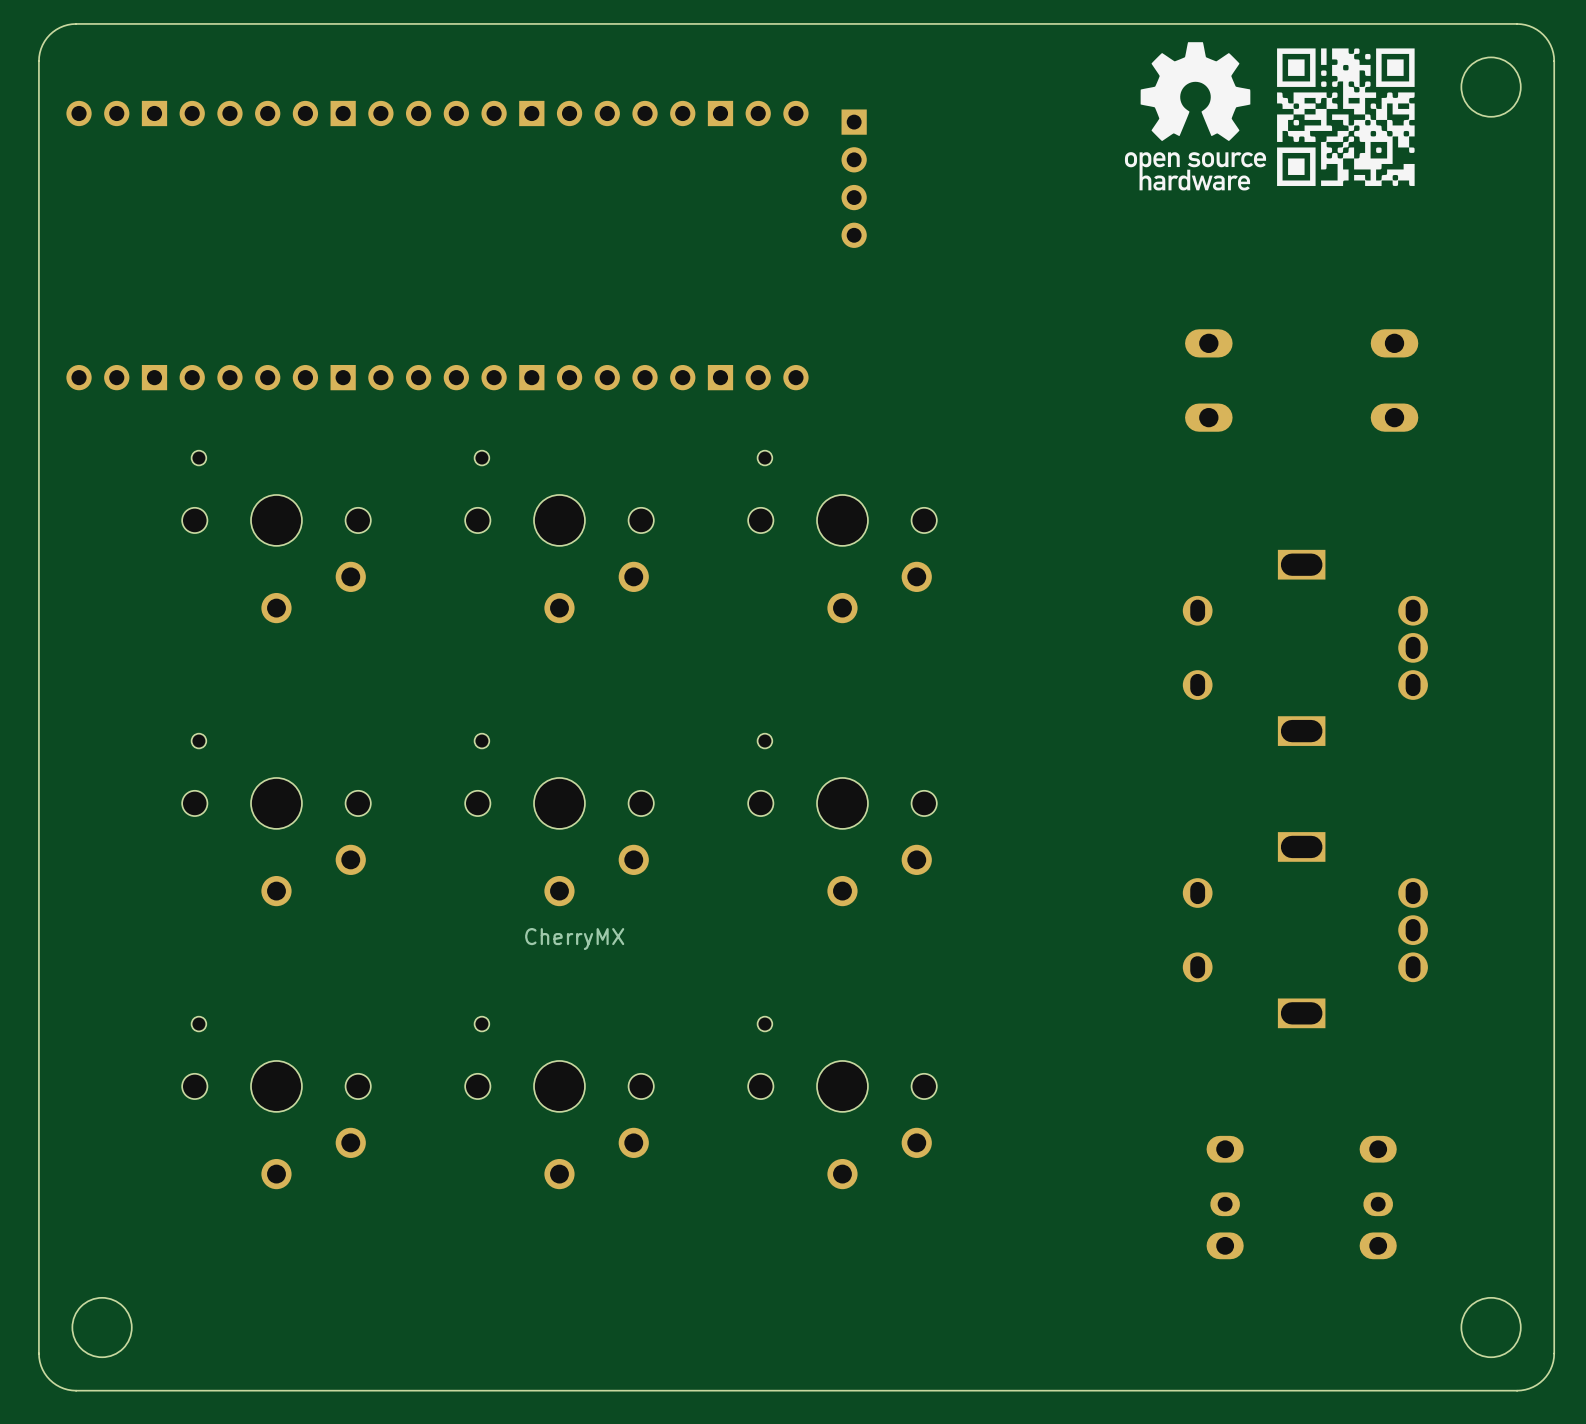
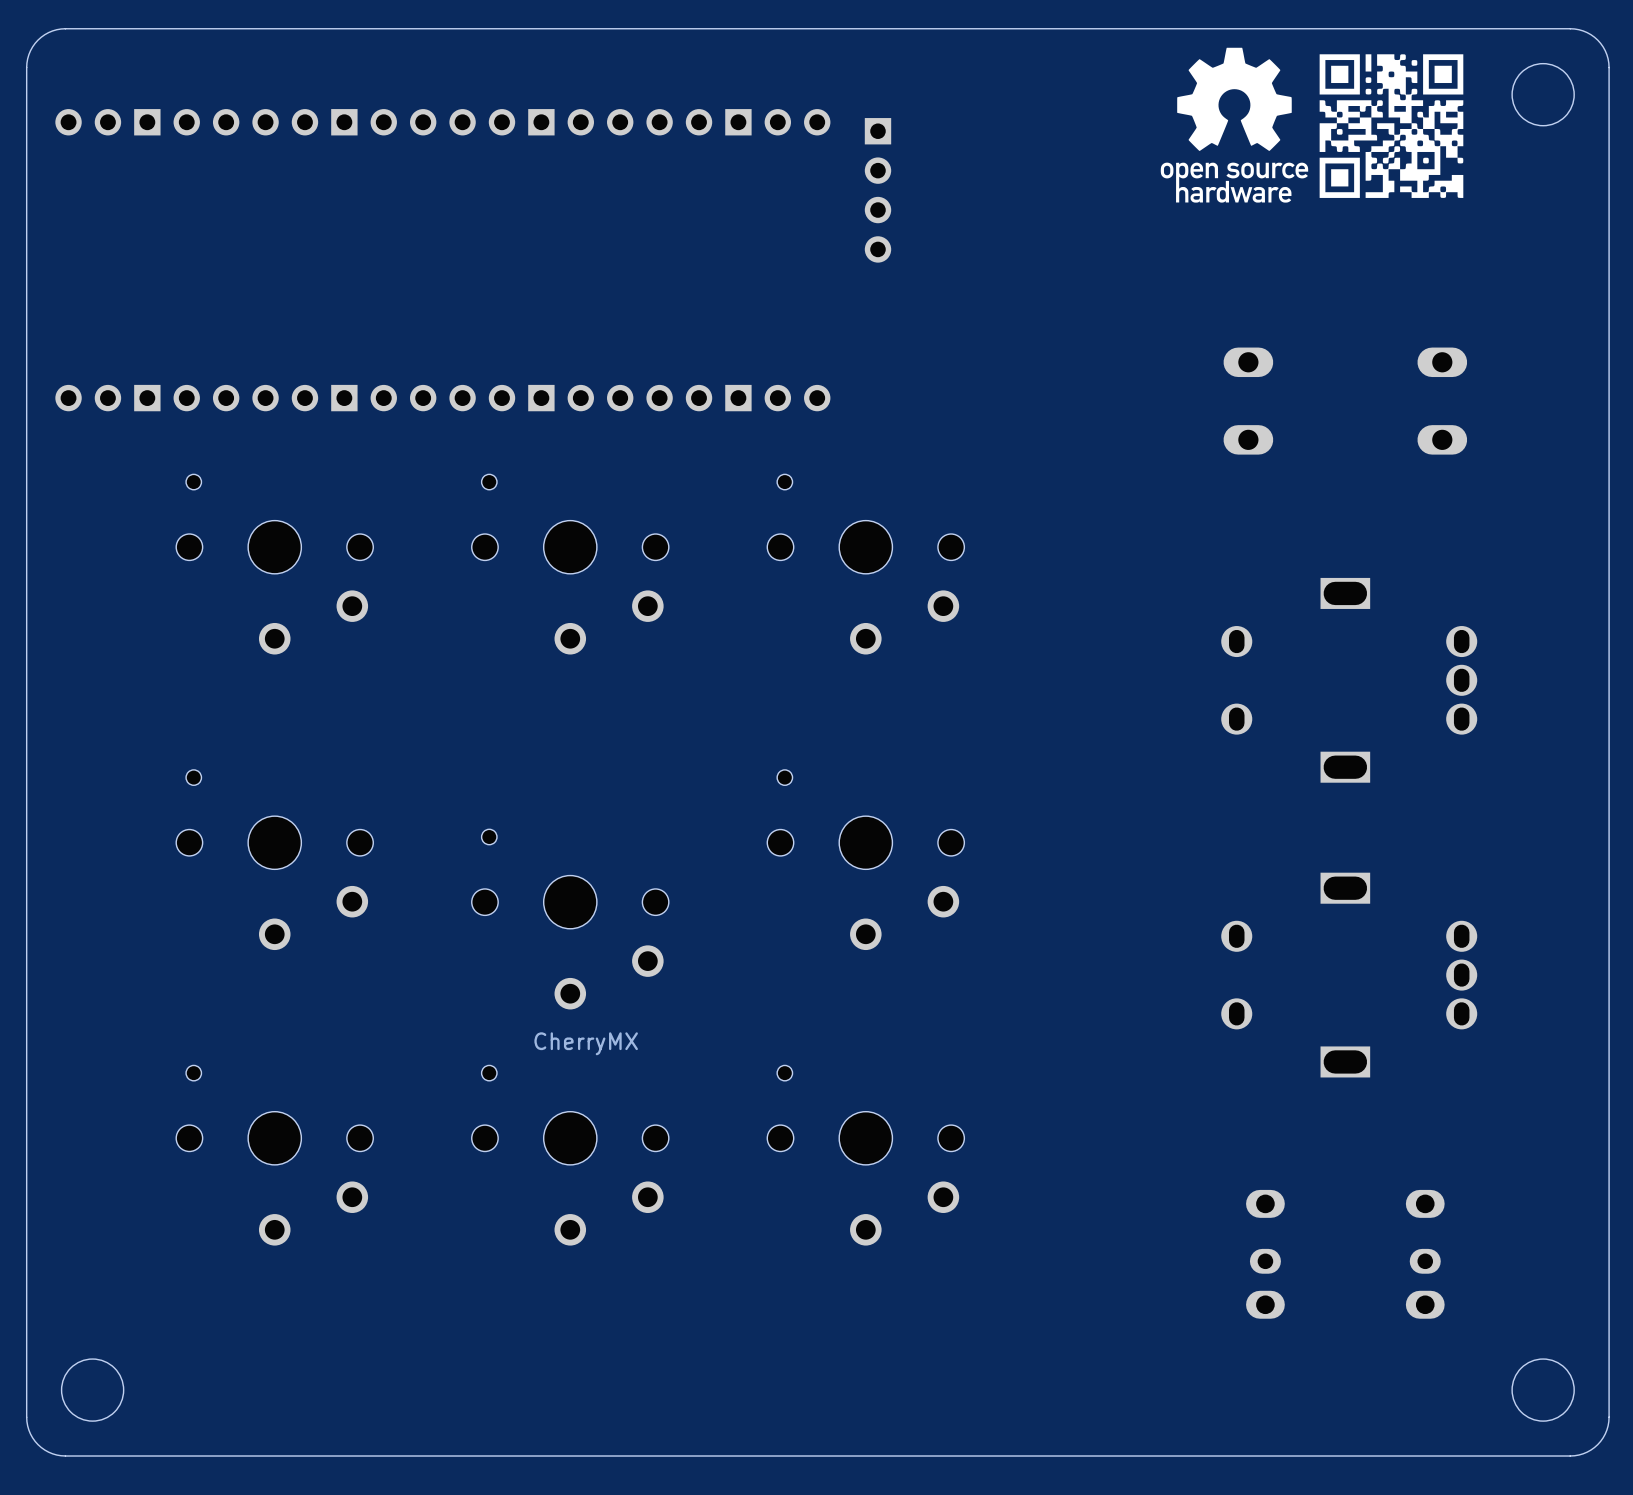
part position: (559, 819) -> (570, 919)

